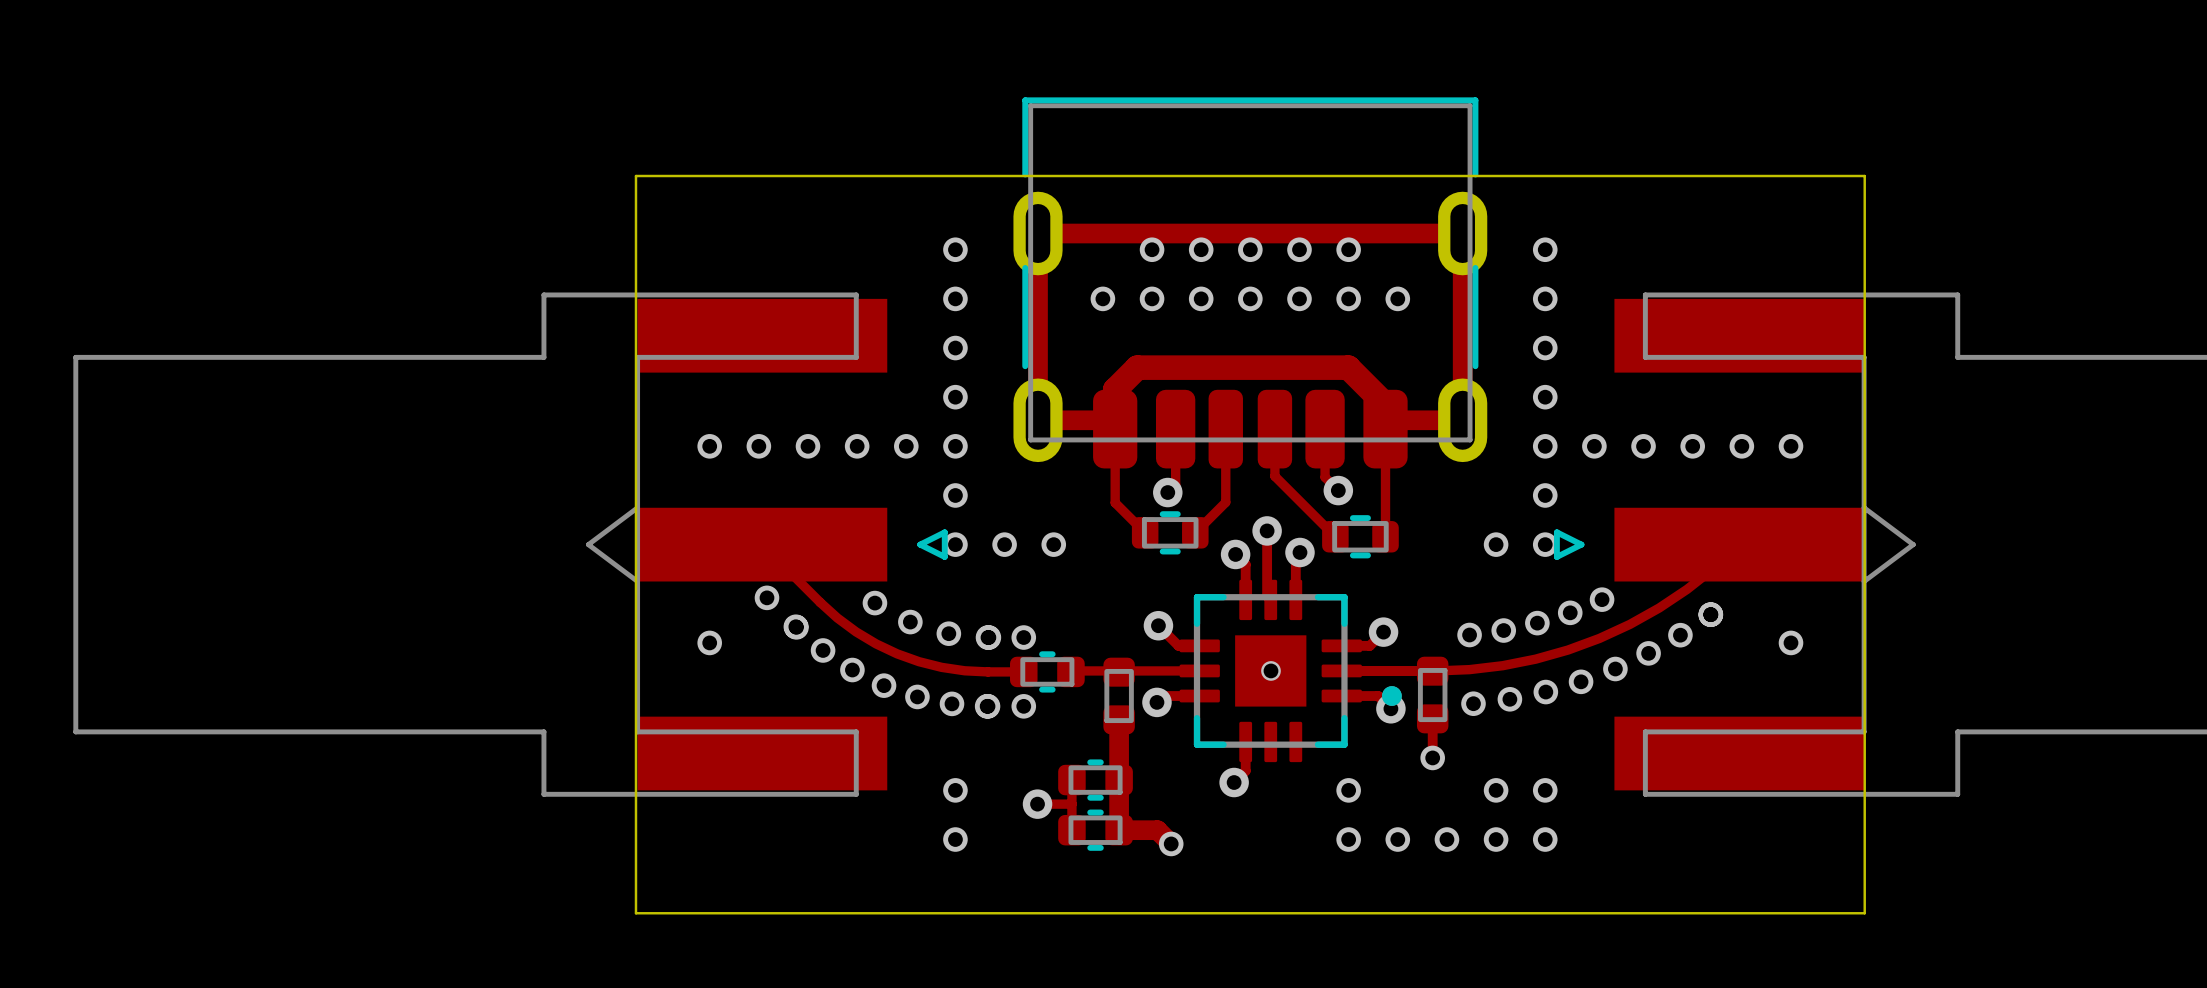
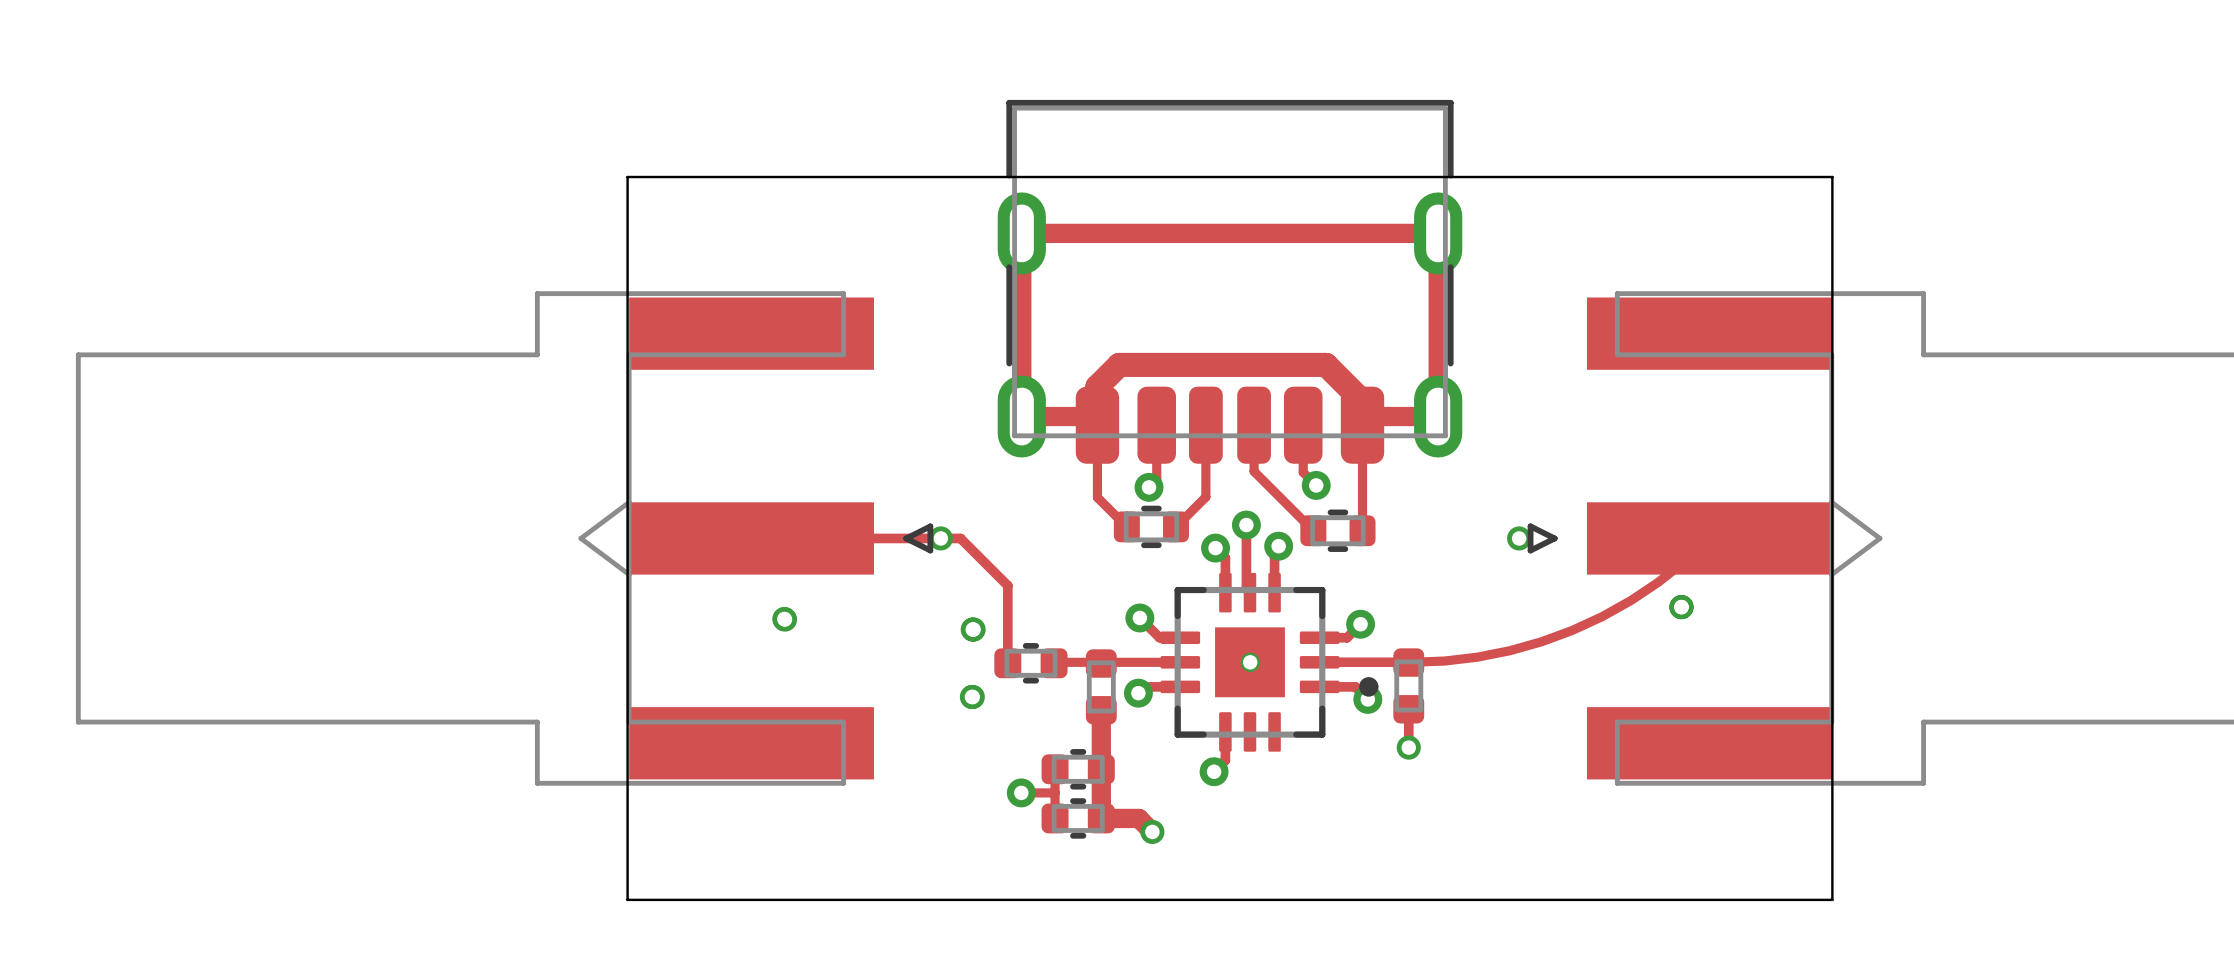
via: (955, 249) -> none
via: (1152, 249) -> none
via: (1201, 249) -> none
via: (1250, 249) -> none
via: (1299, 249) -> none
via: (1348, 249) -> none
via: (1545, 249) -> none
via: (955, 298) -> none
via: (1102, 298) -> none
via: (1152, 298) -> none
via: (1201, 298) -> none
via: (1250, 298) -> none
via: (1299, 298) -> none
via: (1348, 298) -> none
via: (1397, 298) -> none
via: (1545, 298) -> none
via: (955, 348) -> none
via: (1545, 348) -> none
via: (955, 397) -> none
via: (1545, 397) -> none
via: (709, 446) -> none
via: (758, 446) -> none
via: (808, 446) -> none
via: (857, 446) -> none
via: (906, 446) -> none
via: (955, 446) -> none
via: (1545, 446) -> none
via: (1594, 446) -> none
via: (1643, 446) -> none
via: (1692, 446) -> none
via: (1741, 446) -> none
via: (1790, 446) -> none
via: (955, 495) -> none
via: (1545, 495) -> none
track: (762, 544) (837, 618) (876, 643) (897, 653) (941, 667) (964, 670) (1023, 671) -> (751, 538) (960, 538) (1007, 585) (1007, 663)
via: (1004, 544) -> none
via: (1053, 544) -> none
via: (1496, 544) -> none
via: (766, 597) -> none
via: (1602, 599) -> none
via: (874, 603) -> none
via: (1570, 612) -> none
via: (910, 622) -> none
via: (1537, 623) -> none
via: (1503, 630) -> none
via: (948, 633) -> none
via: (1469, 635) -> none
via: (1680, 635) -> none
via: (1023, 637) -> none
via: (709, 642) -> none
via: (1790, 642) -> none
via: (823, 650) -> none
via: (1648, 653) -> none
via: (1615, 669) -> none
via: (852, 670) -> none
via: (1581, 681) -> none
via: (884, 685) -> none
via: (1545, 692) -> none
via: (917, 696) -> none
via: (1509, 699) -> none
via: (951, 703) -> none
via: (1473, 703) -> none
via: (1023, 706) -> none
via: (955, 790) -> none
via: (1348, 790) -> none
via: (1496, 790) -> none
via: (1545, 790) -> none
via: (955, 839) -> none
via: (1348, 839) -> none
via: (1397, 839) -> none
via: (1446, 839) -> none
via: (1496, 839) -> none
via: (1545, 839) -> none

